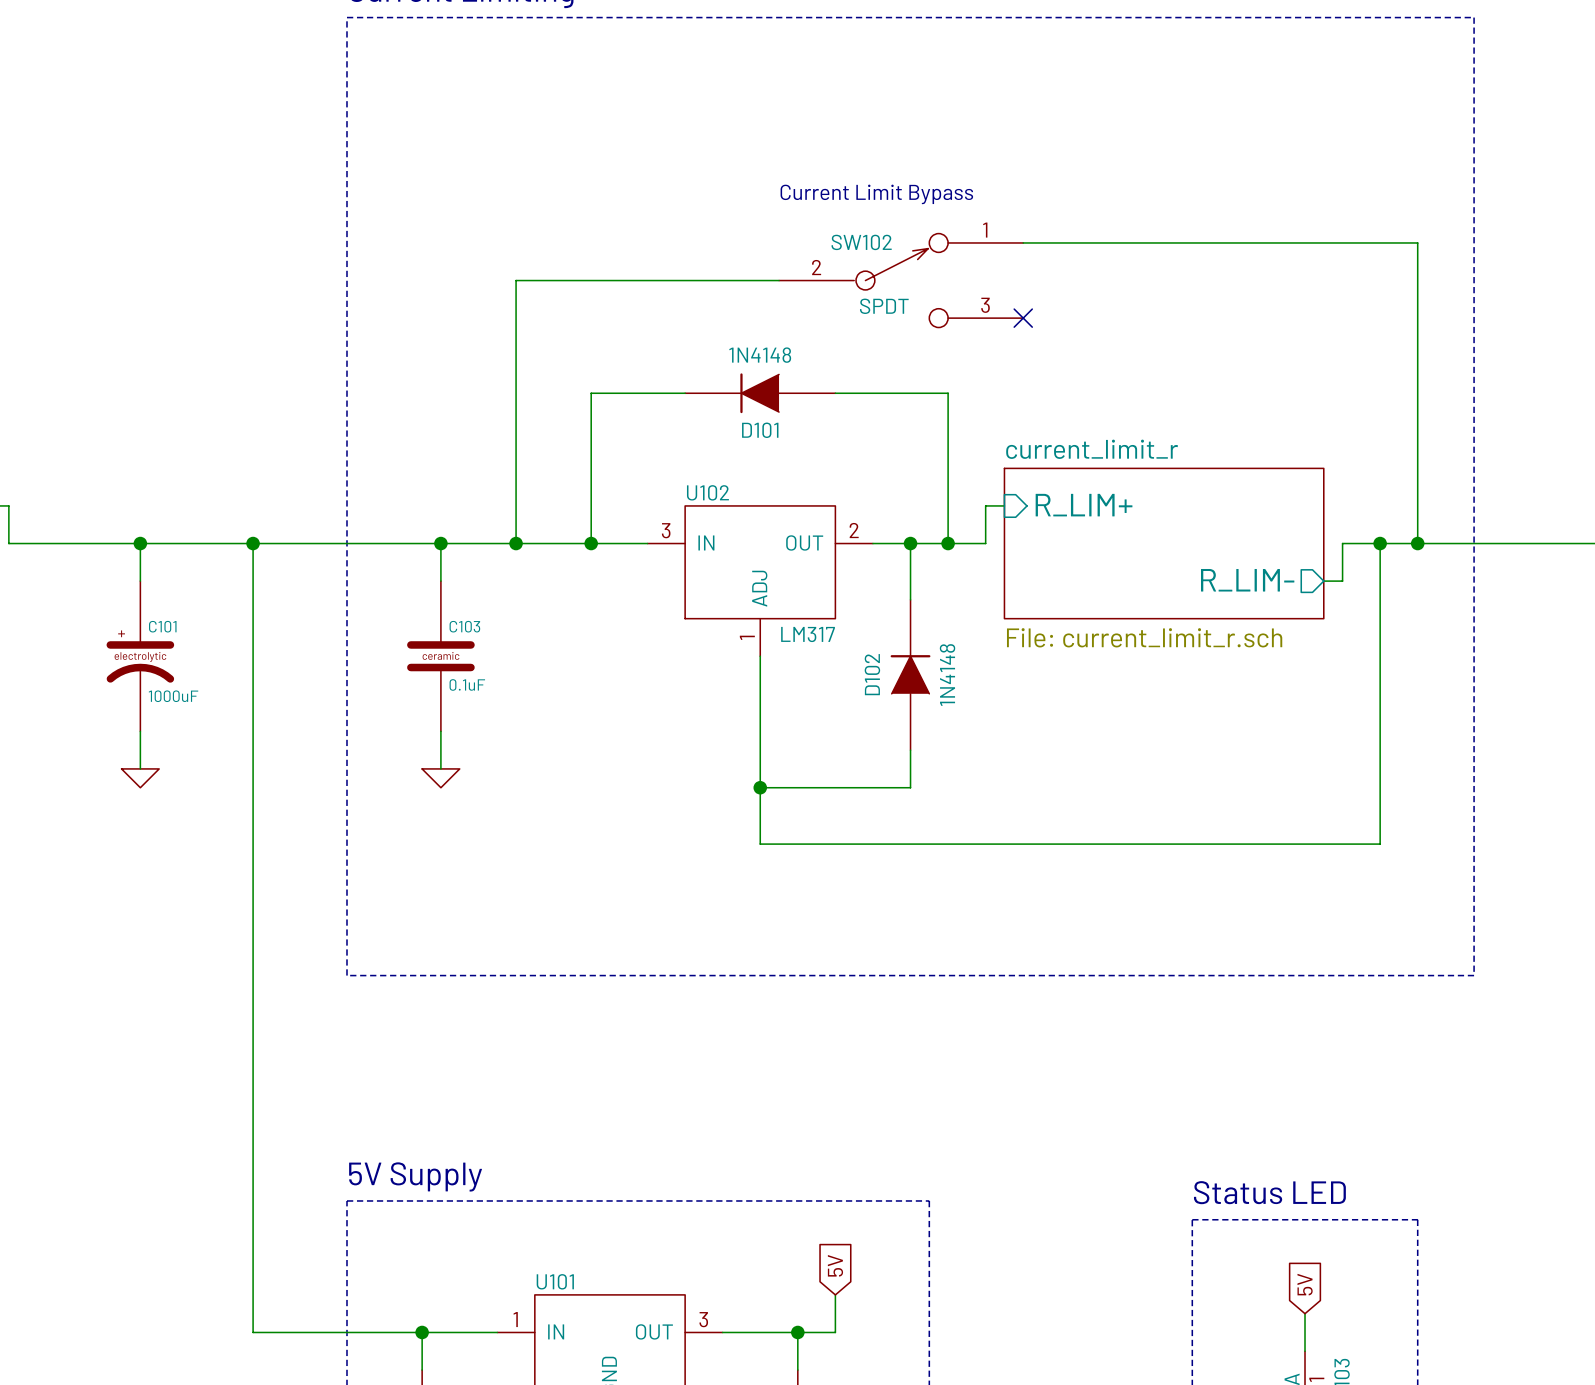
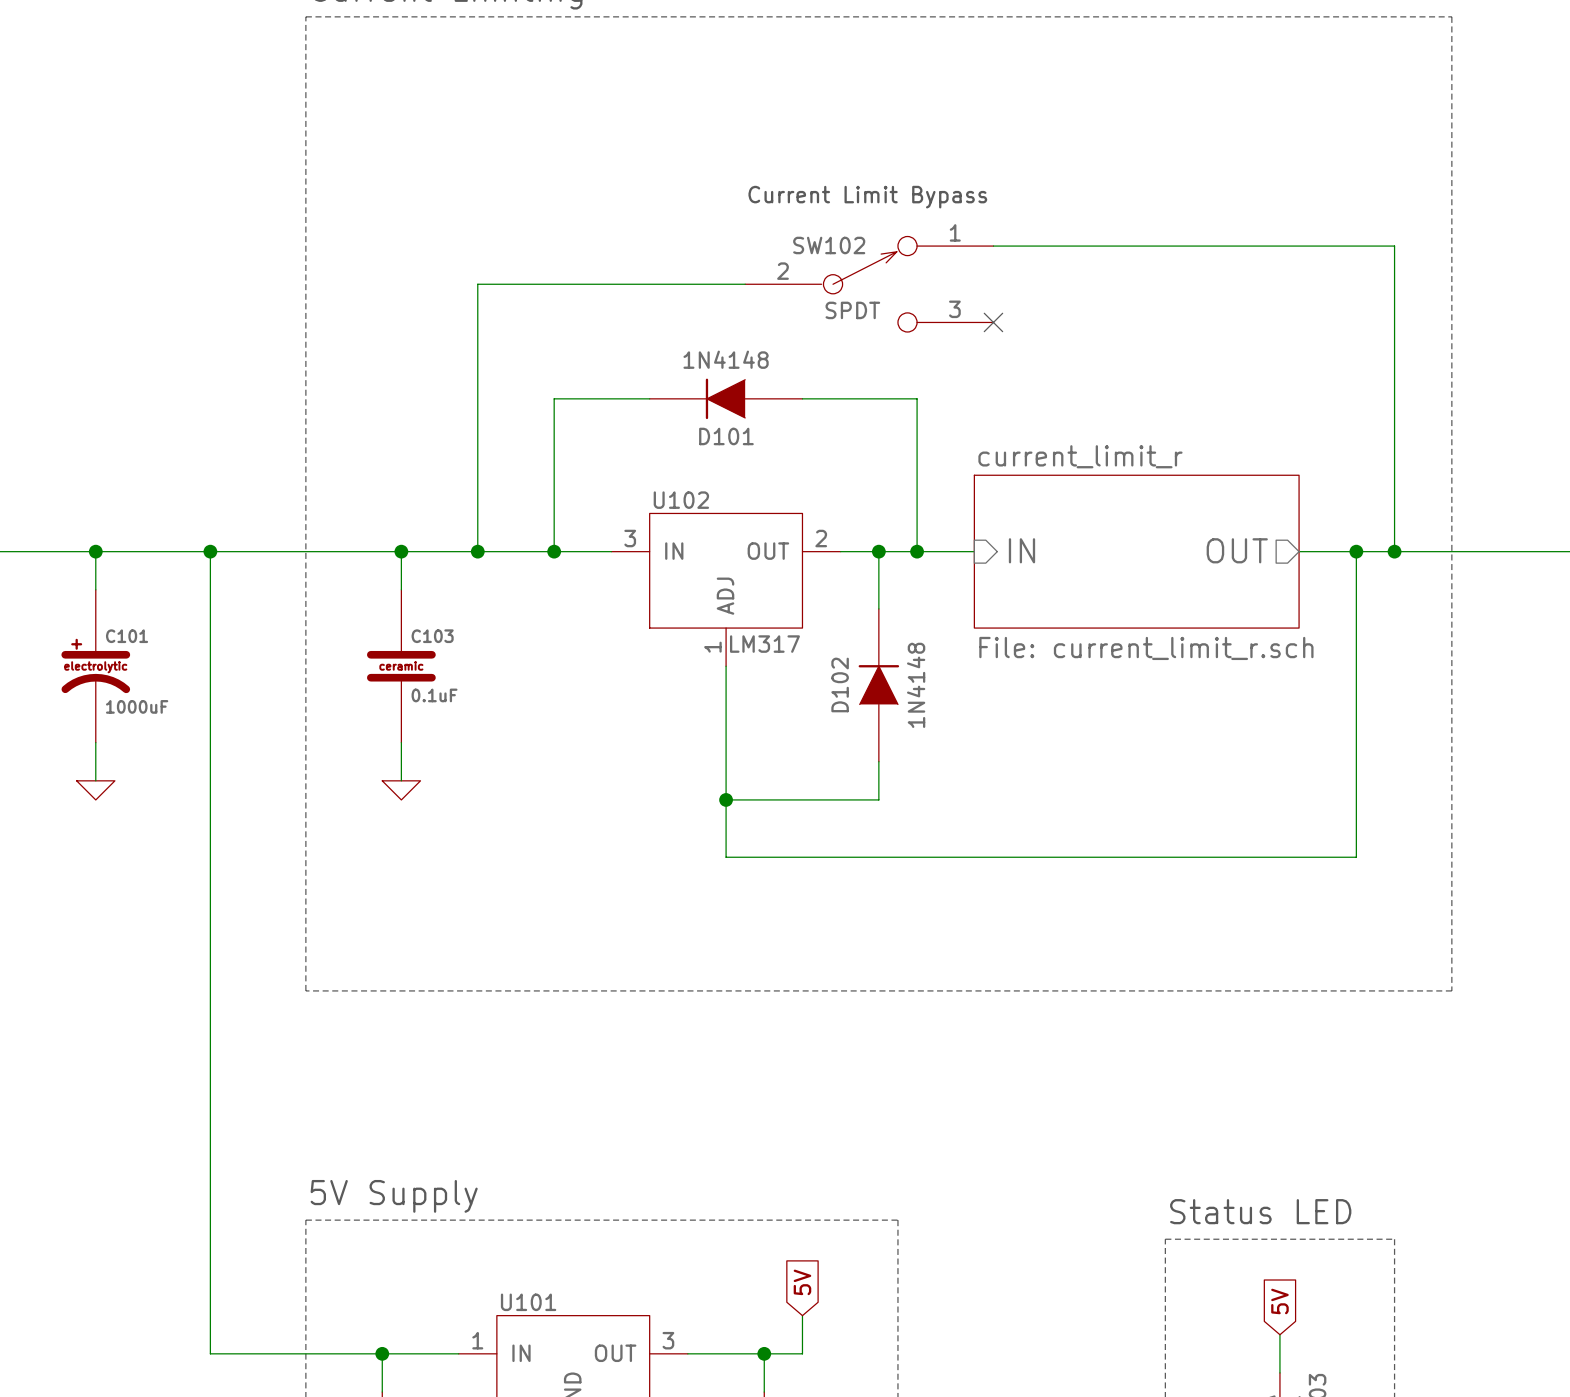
wire: (1004, 505) (985, 505) (985, 543) -> (974, 551) (955, 551)
sheet pin: R_LIM+ (1084, 505) -> none
sheet pin: none -> IN (1021, 550)
sheet pin: none -> OUT (1237, 550)
wire: (1342, 543) (1342, 581) (1323, 581) -> (1318, 551) (1299, 551)
sheet pin: R_LIM- (1247, 580) -> none

